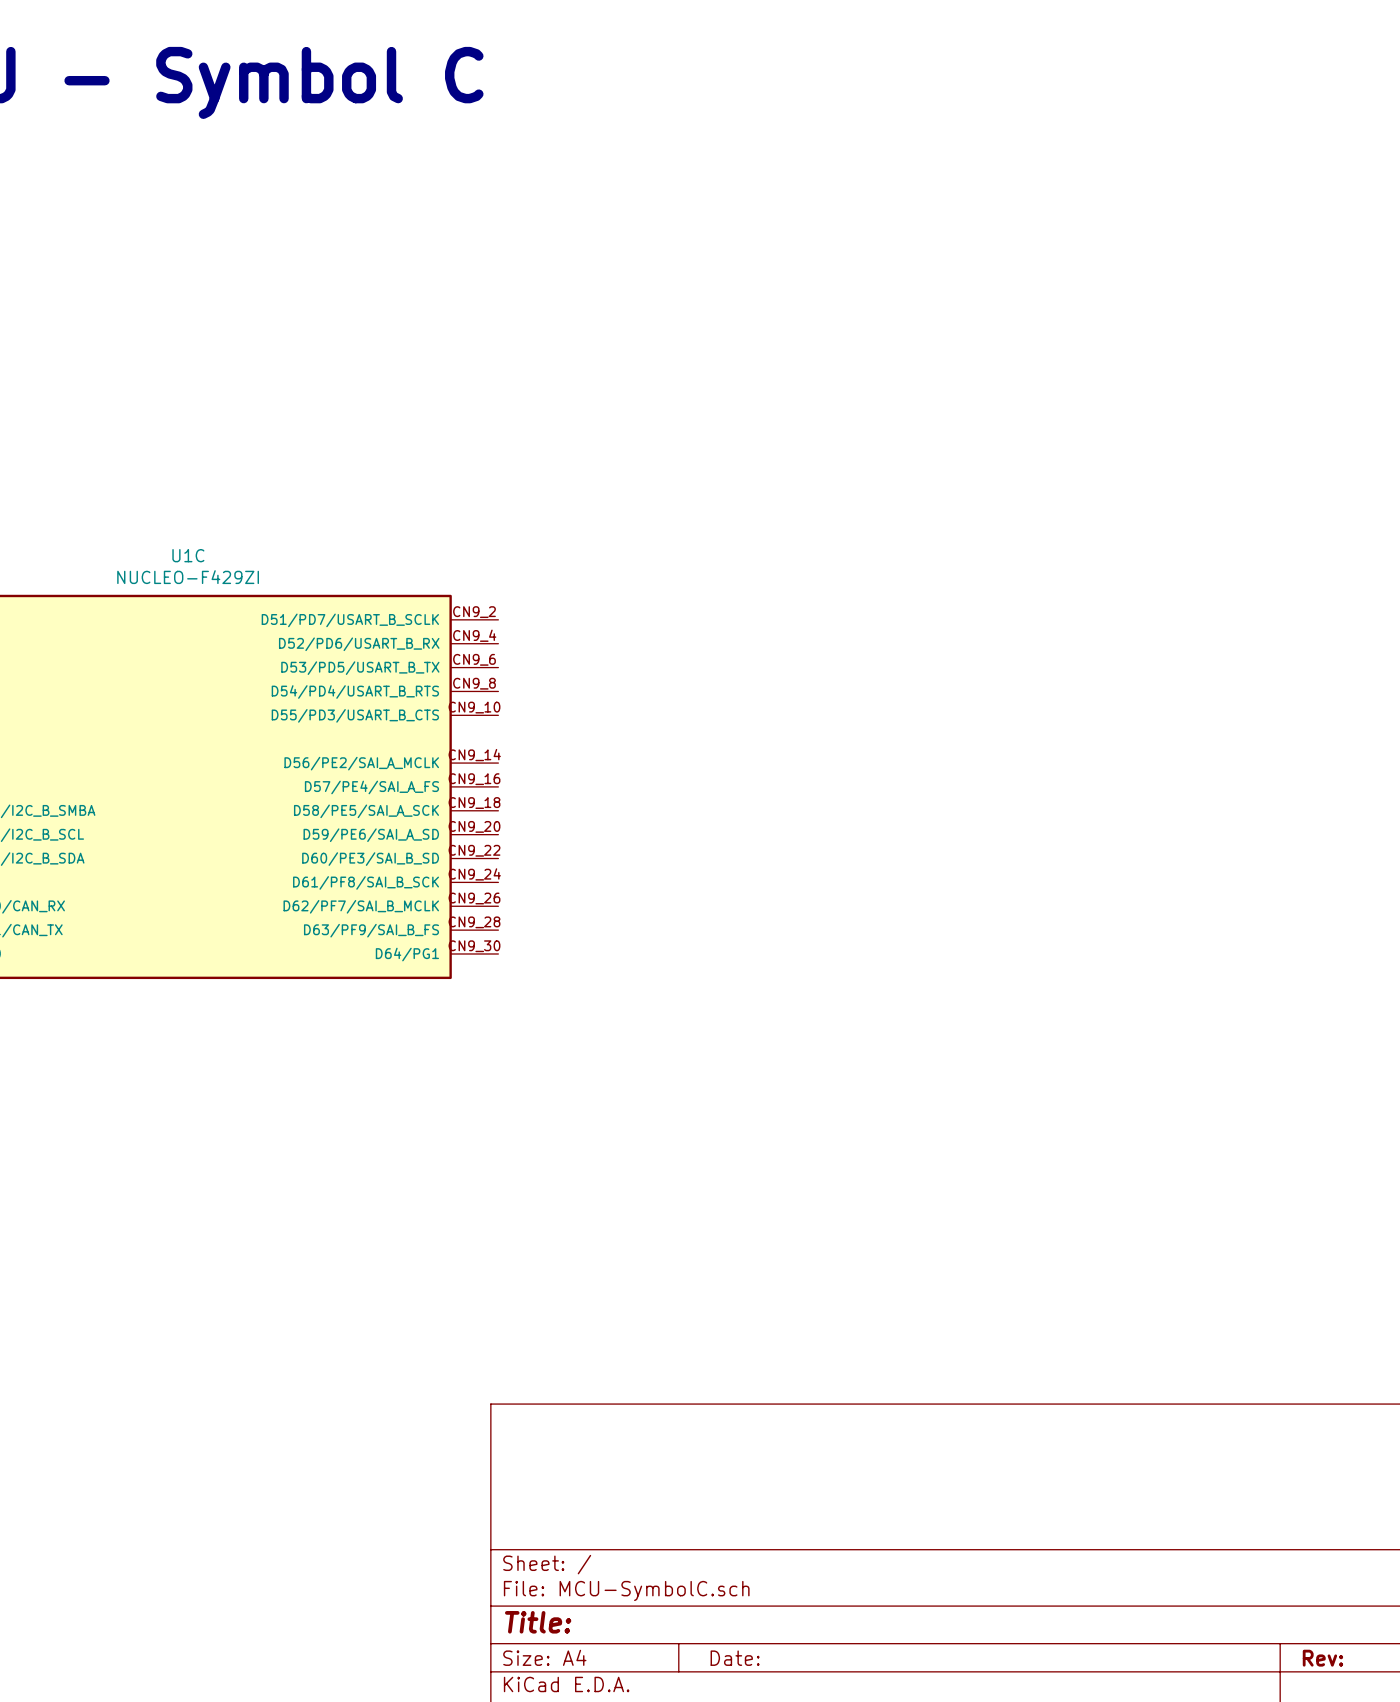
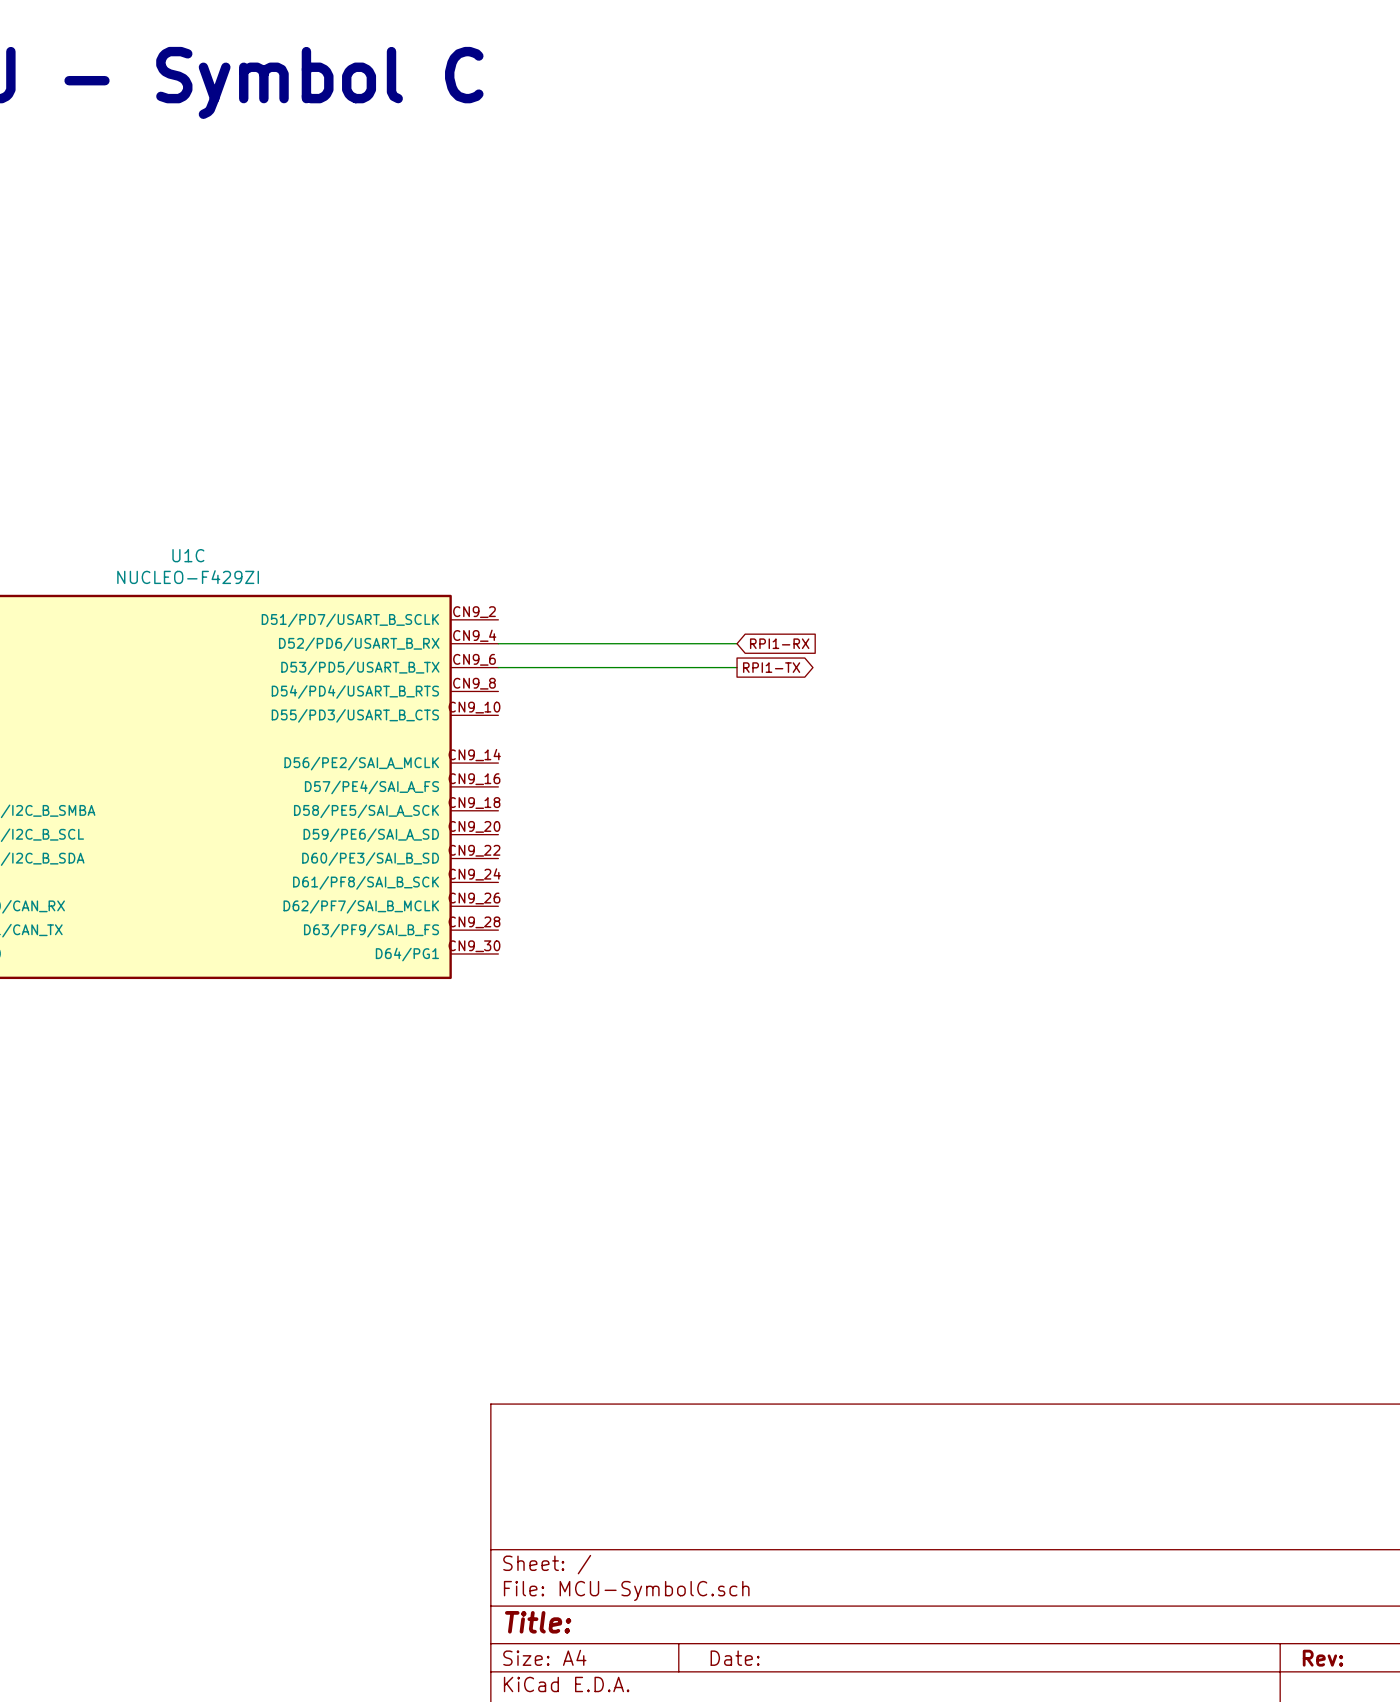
wire: none -> (498, 643) (737, 643)
global label: none -> RPI1-RX (779, 643)
wire: none -> (498, 667) (737, 667)
global label: none -> RPI1-TX (771, 667)

